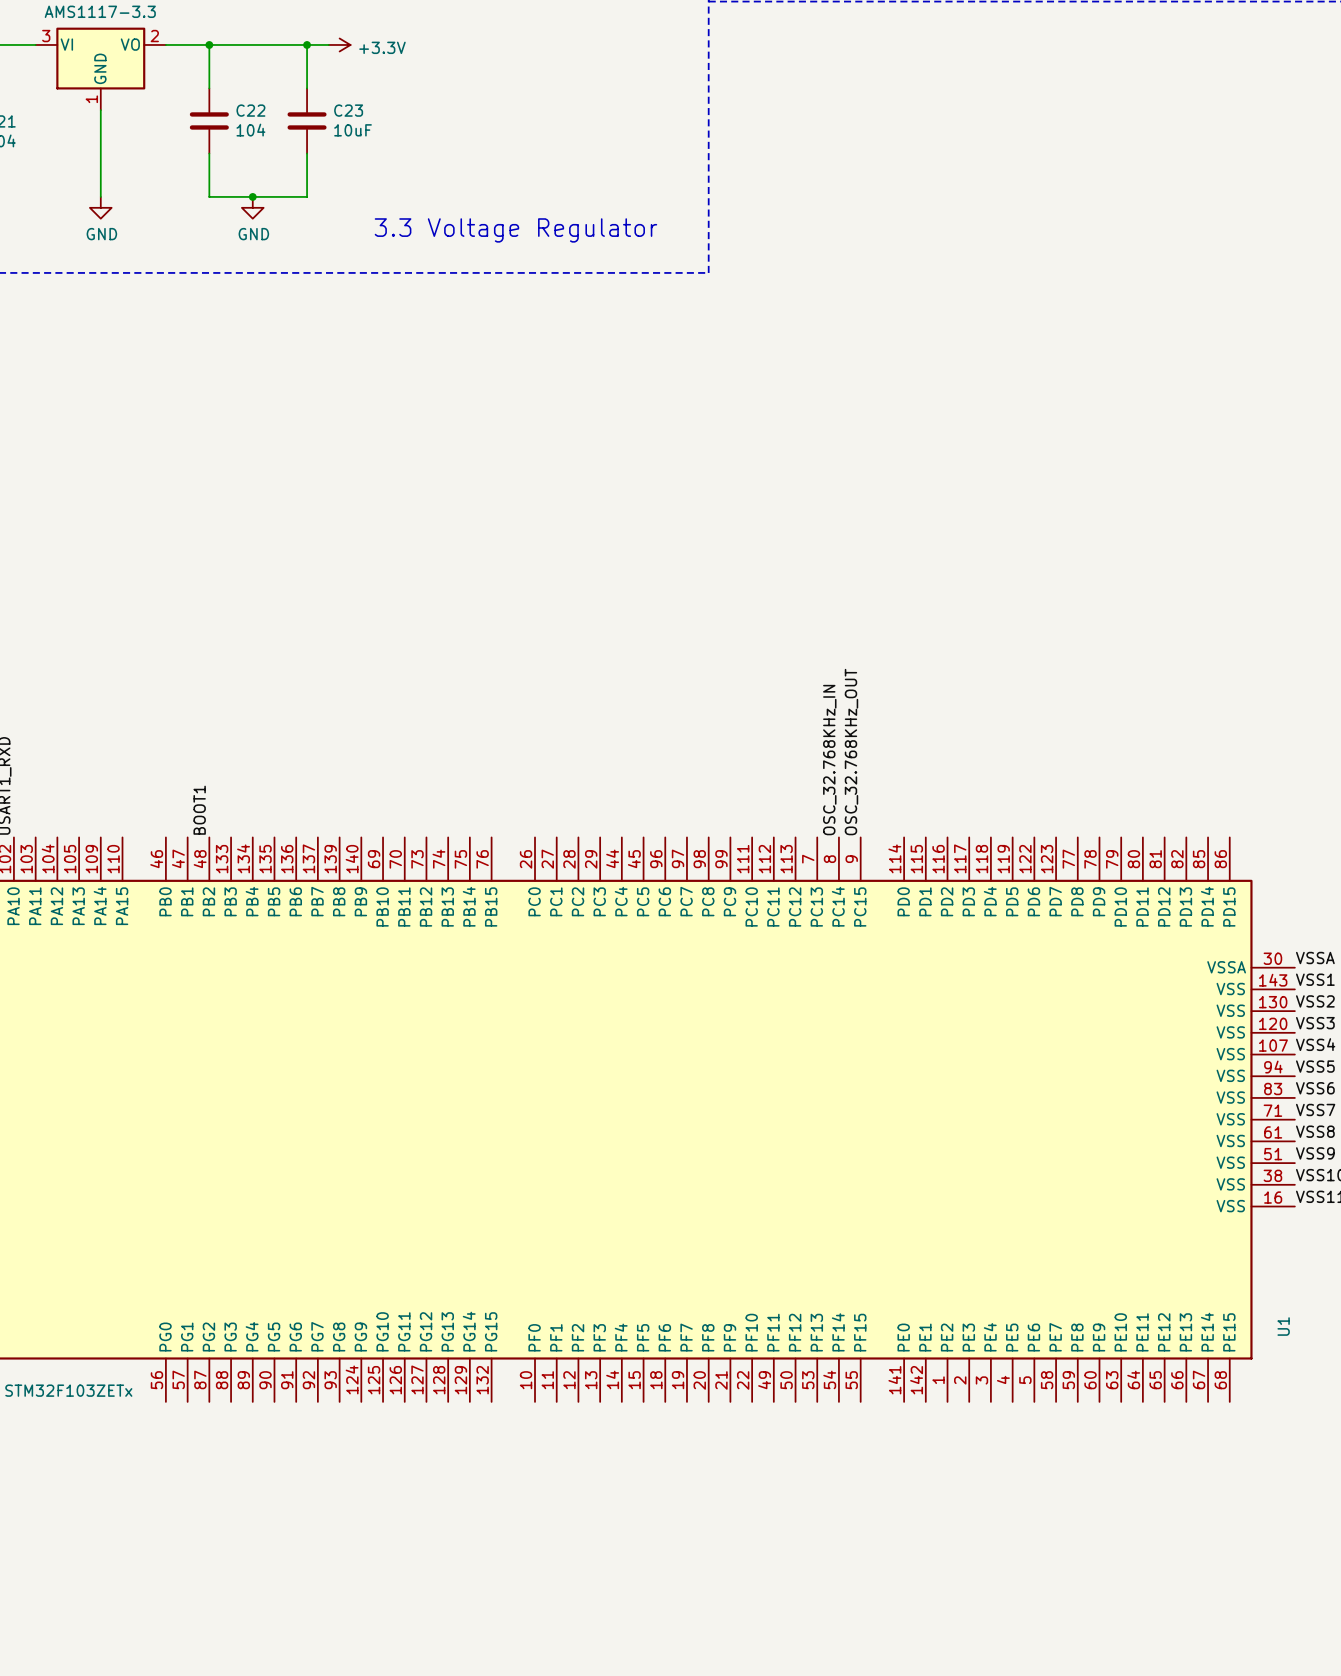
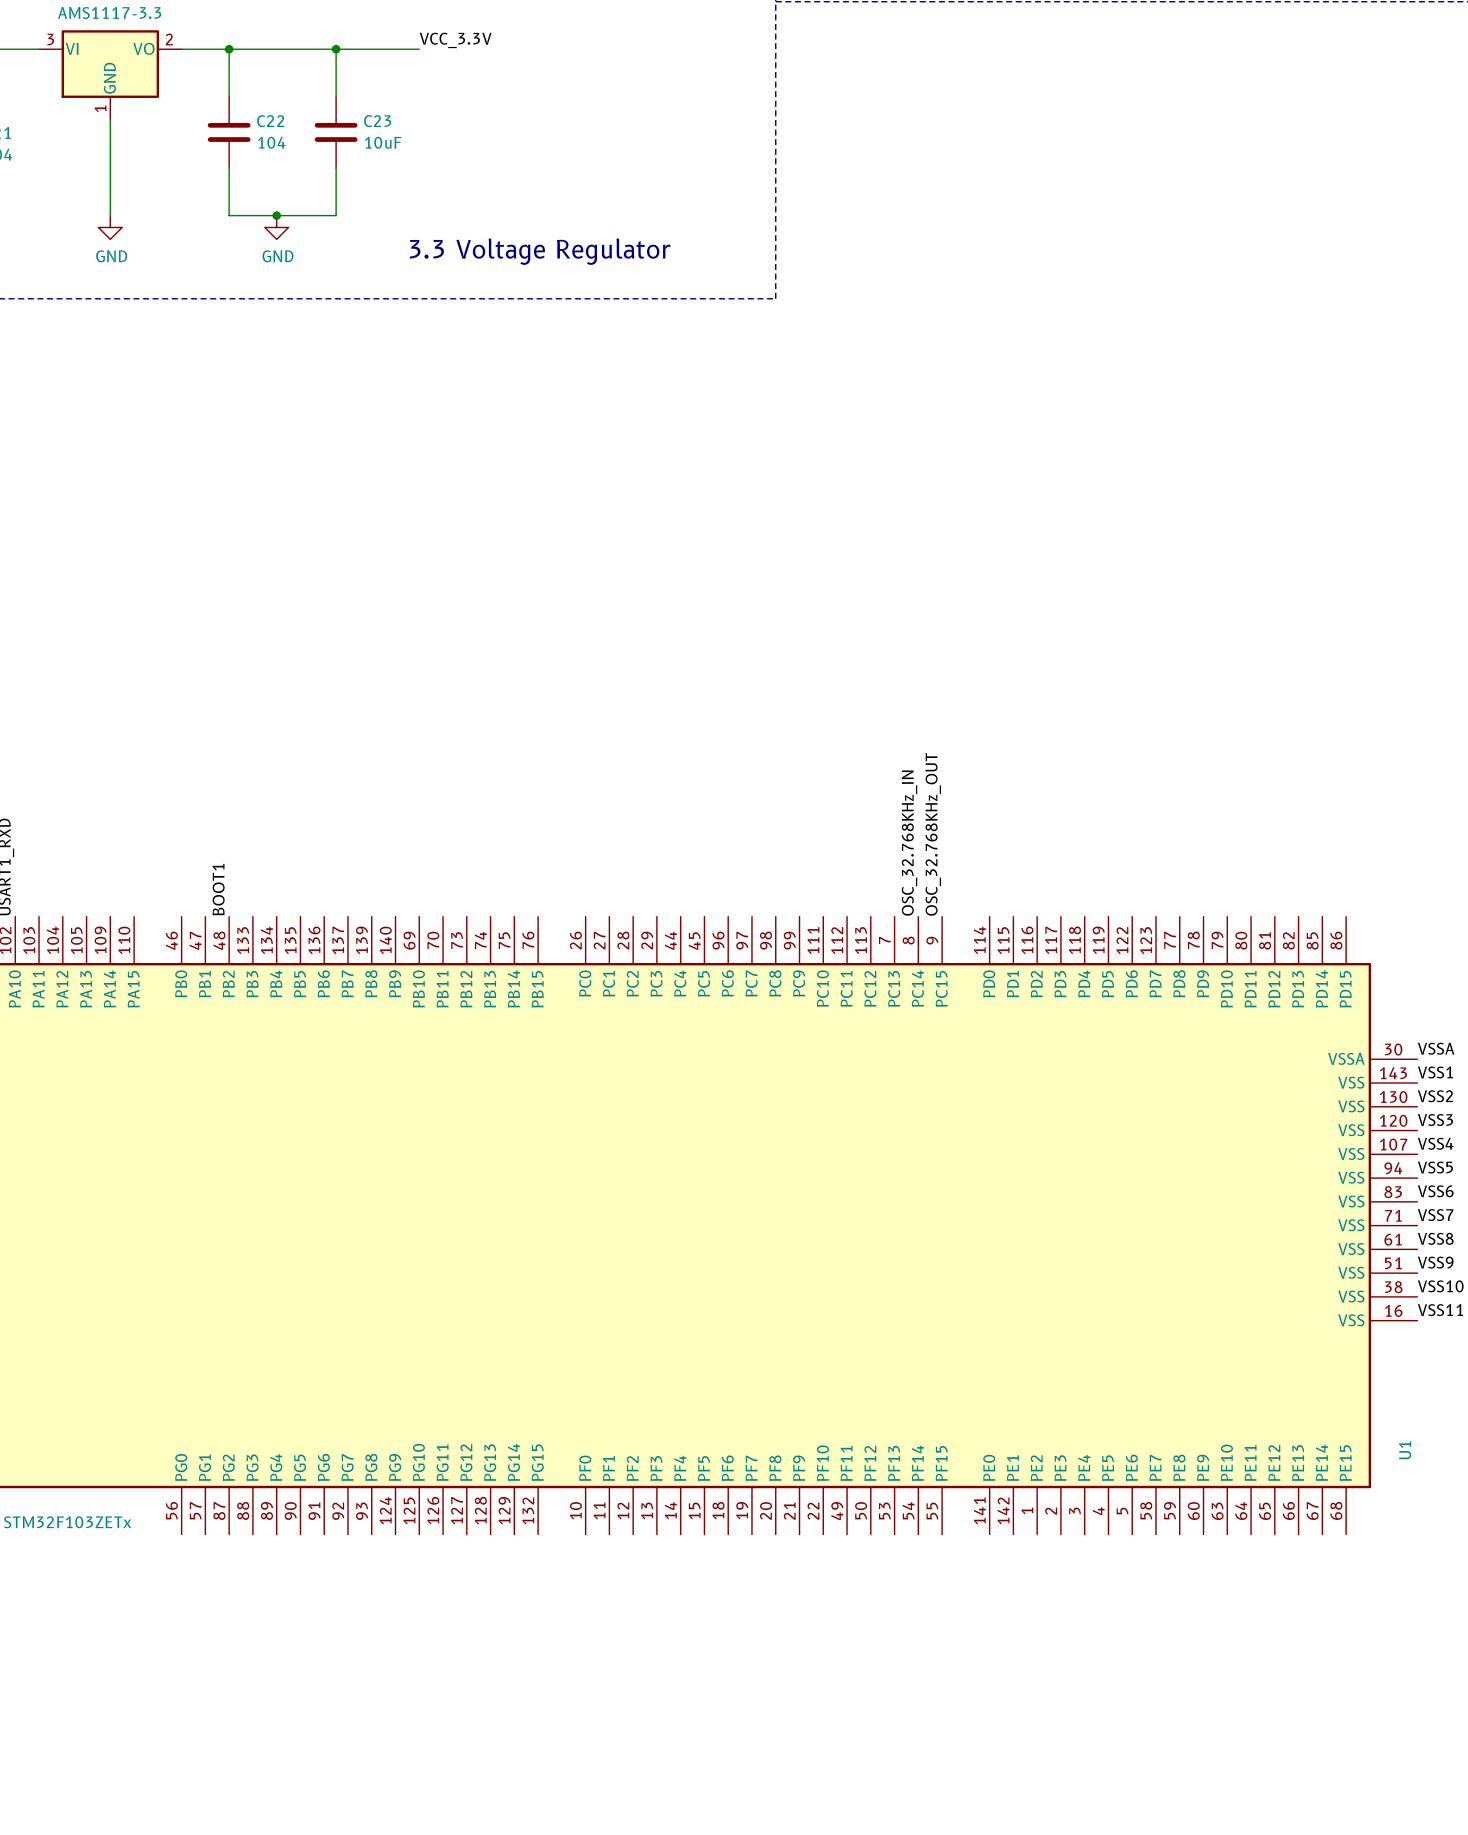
label: none -> VCC_3.3V (455, 40)
wire: none -> (359, 49) (419, 49)
power symbol: +3.3V (339, 44) -> none

